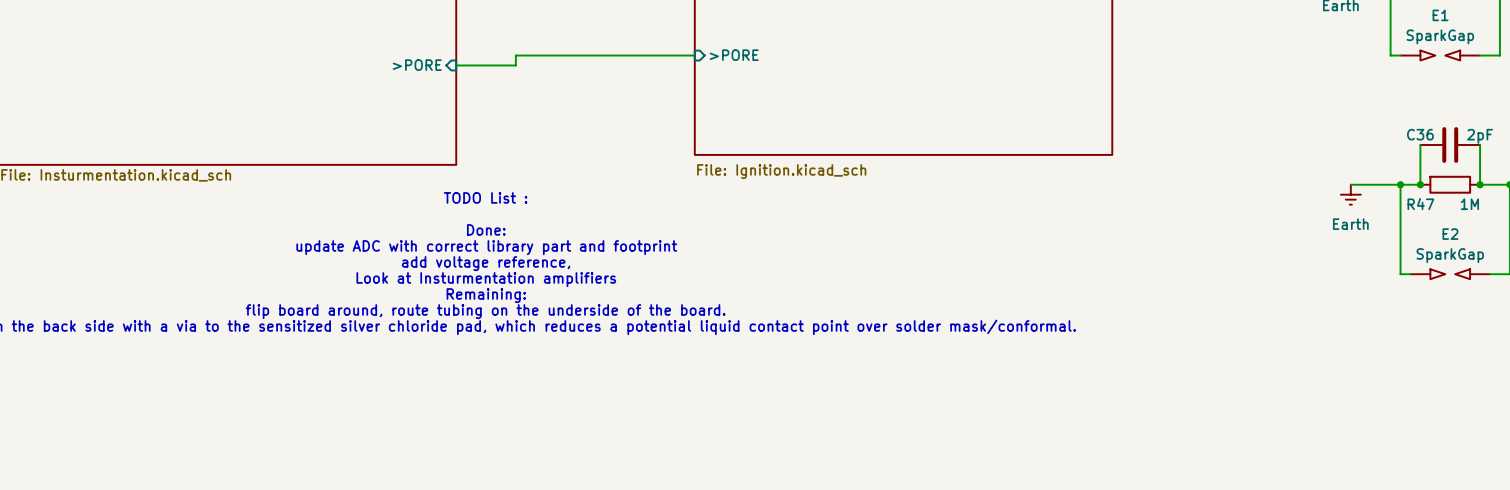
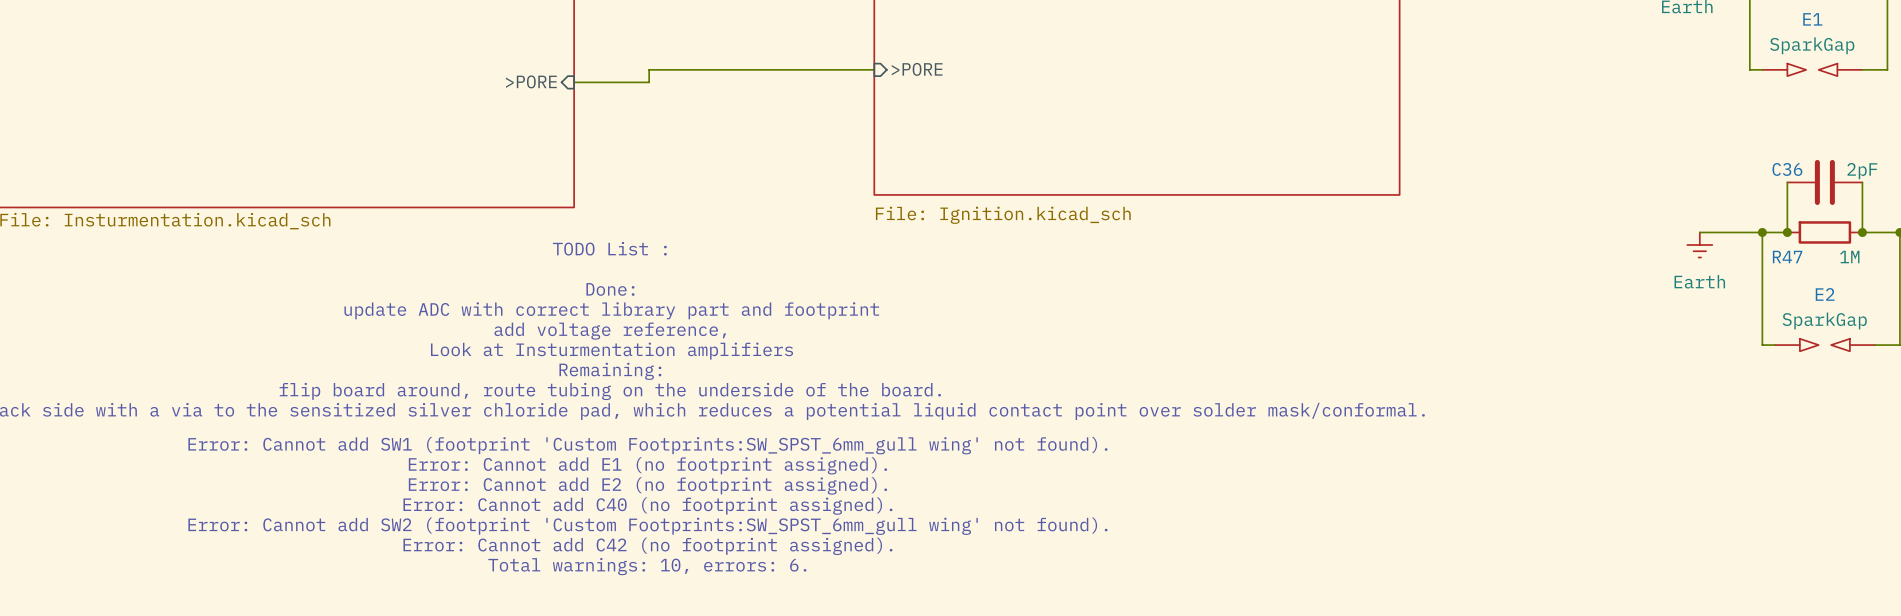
text: none -> Error: Cannot add SW1 (footprint 'Custom Footprints:SW_SPST_6mm_gull wing' not found). (647, 445)
text: none -> Error: Cannot add E1 (no footprint assigned). (647, 465)
text: none -> Error: Cannot add E2 (no footprint assigned). (647, 485)
text: none -> Error: Cannot add C40 (no footprint assigned). (647, 506)
text: none -> Error: Cannot add SW2 (footprint 'Custom Footprints:SW_SPST_6mm_gull wing' not found). (647, 526)
text: none -> Error: Cannot add C42 (no footprint assigned). (647, 546)
text: none -> Total warnings: 10, errors: 6. (647, 566)

